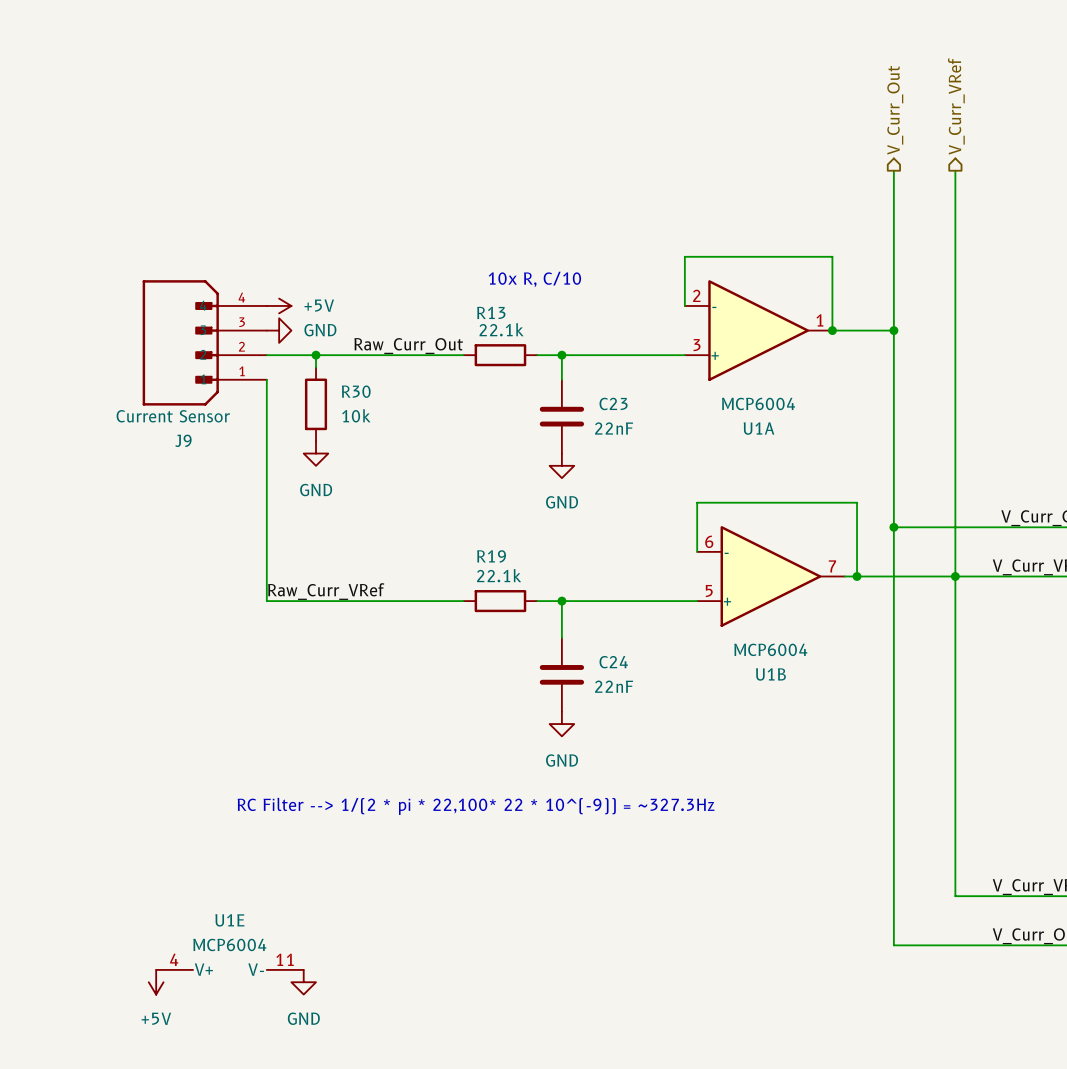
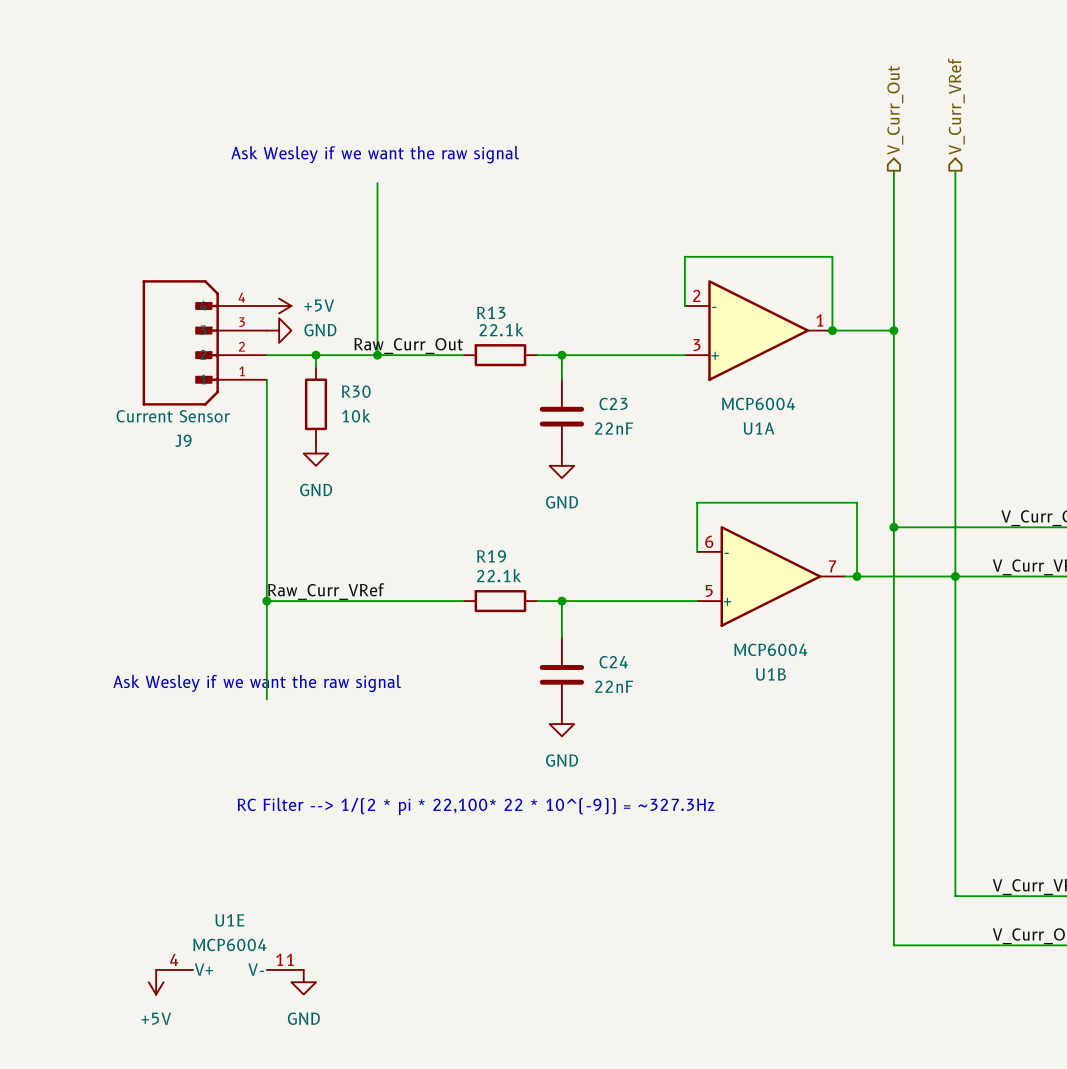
text: none -> Ask Wesley if we want the raw signal (375, 154)
wire: none -> (377, 183) (377, 355)
text: 10x R, C/10 (534, 279) -> none
junction: none -> (377, 355)
wire: none -> (266, 601) (266, 699)
junction: none -> (266, 601)
text: none -> Ask Wesley if we want the raw signal (257, 683)

